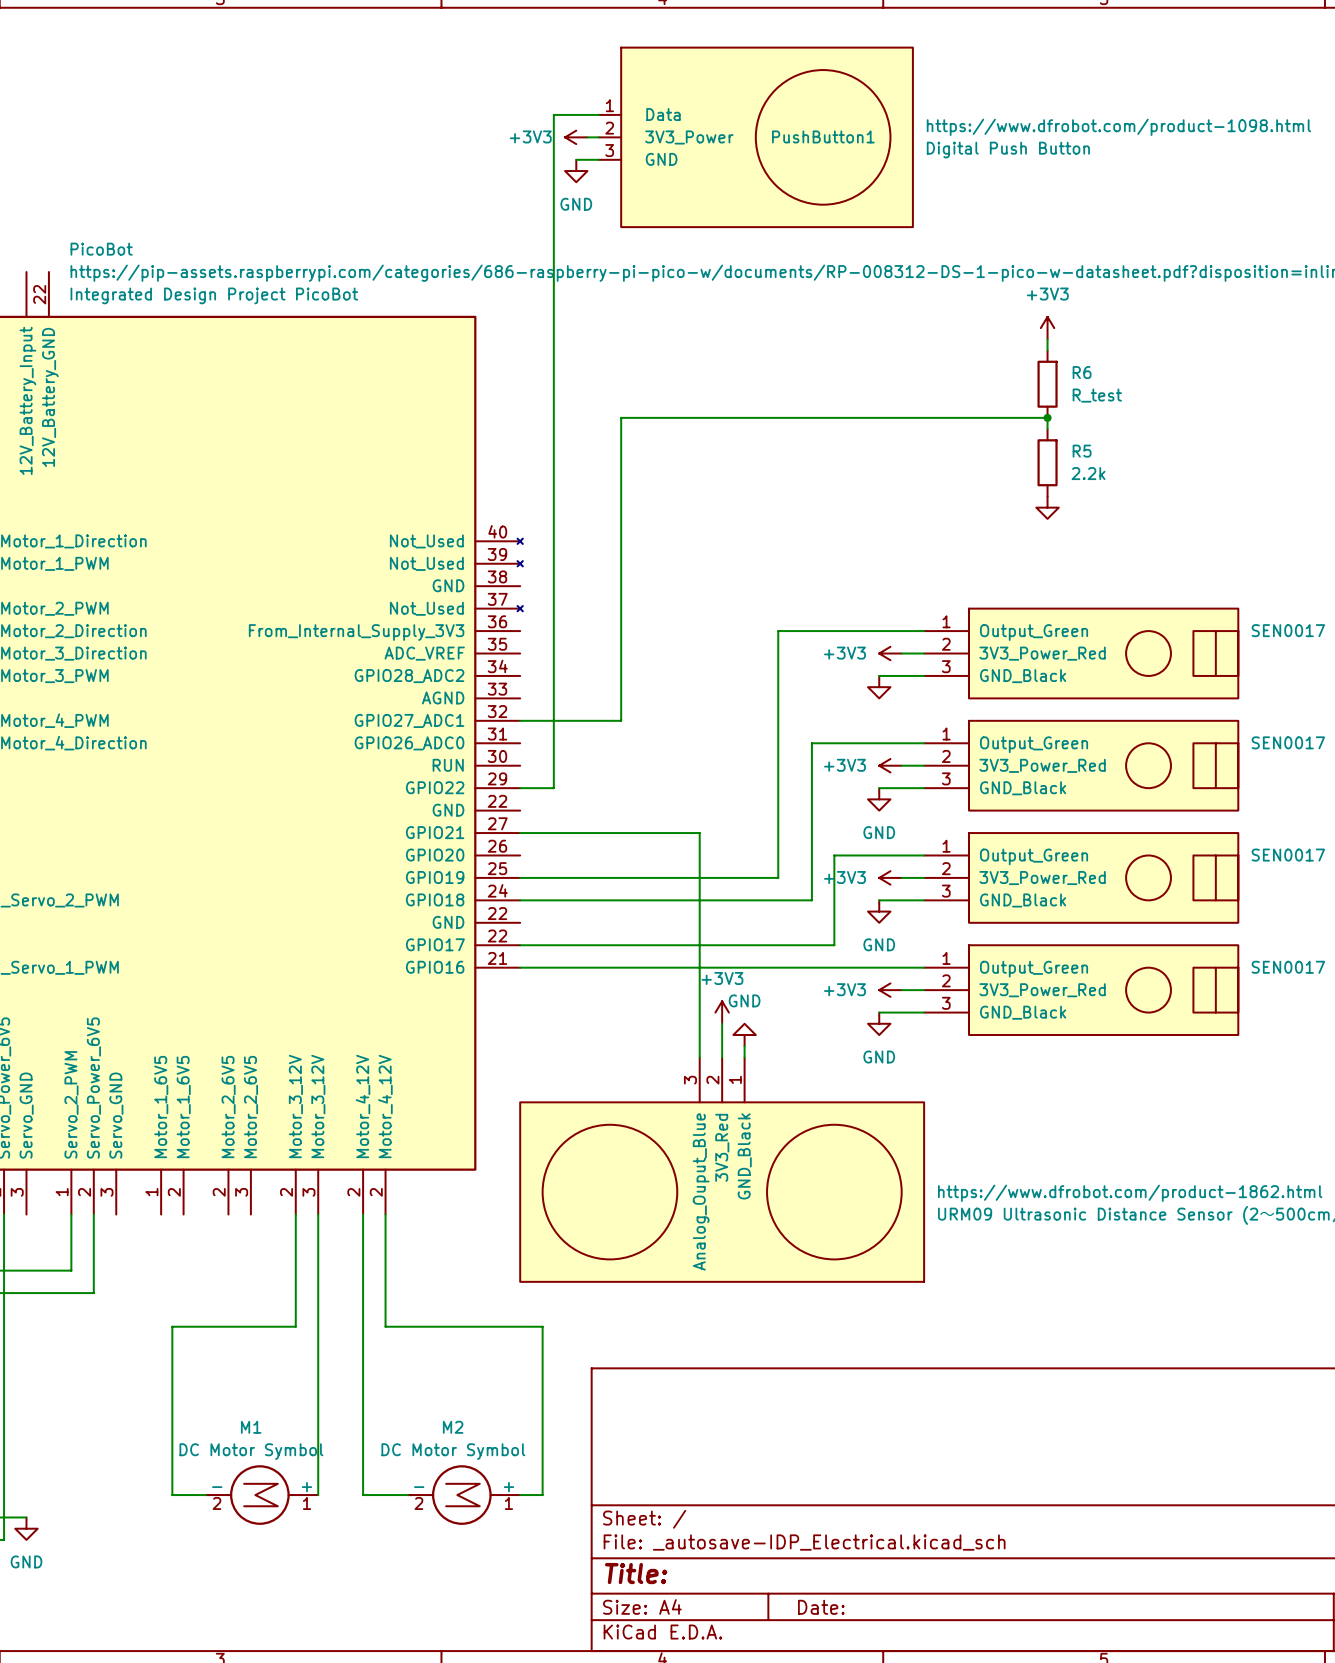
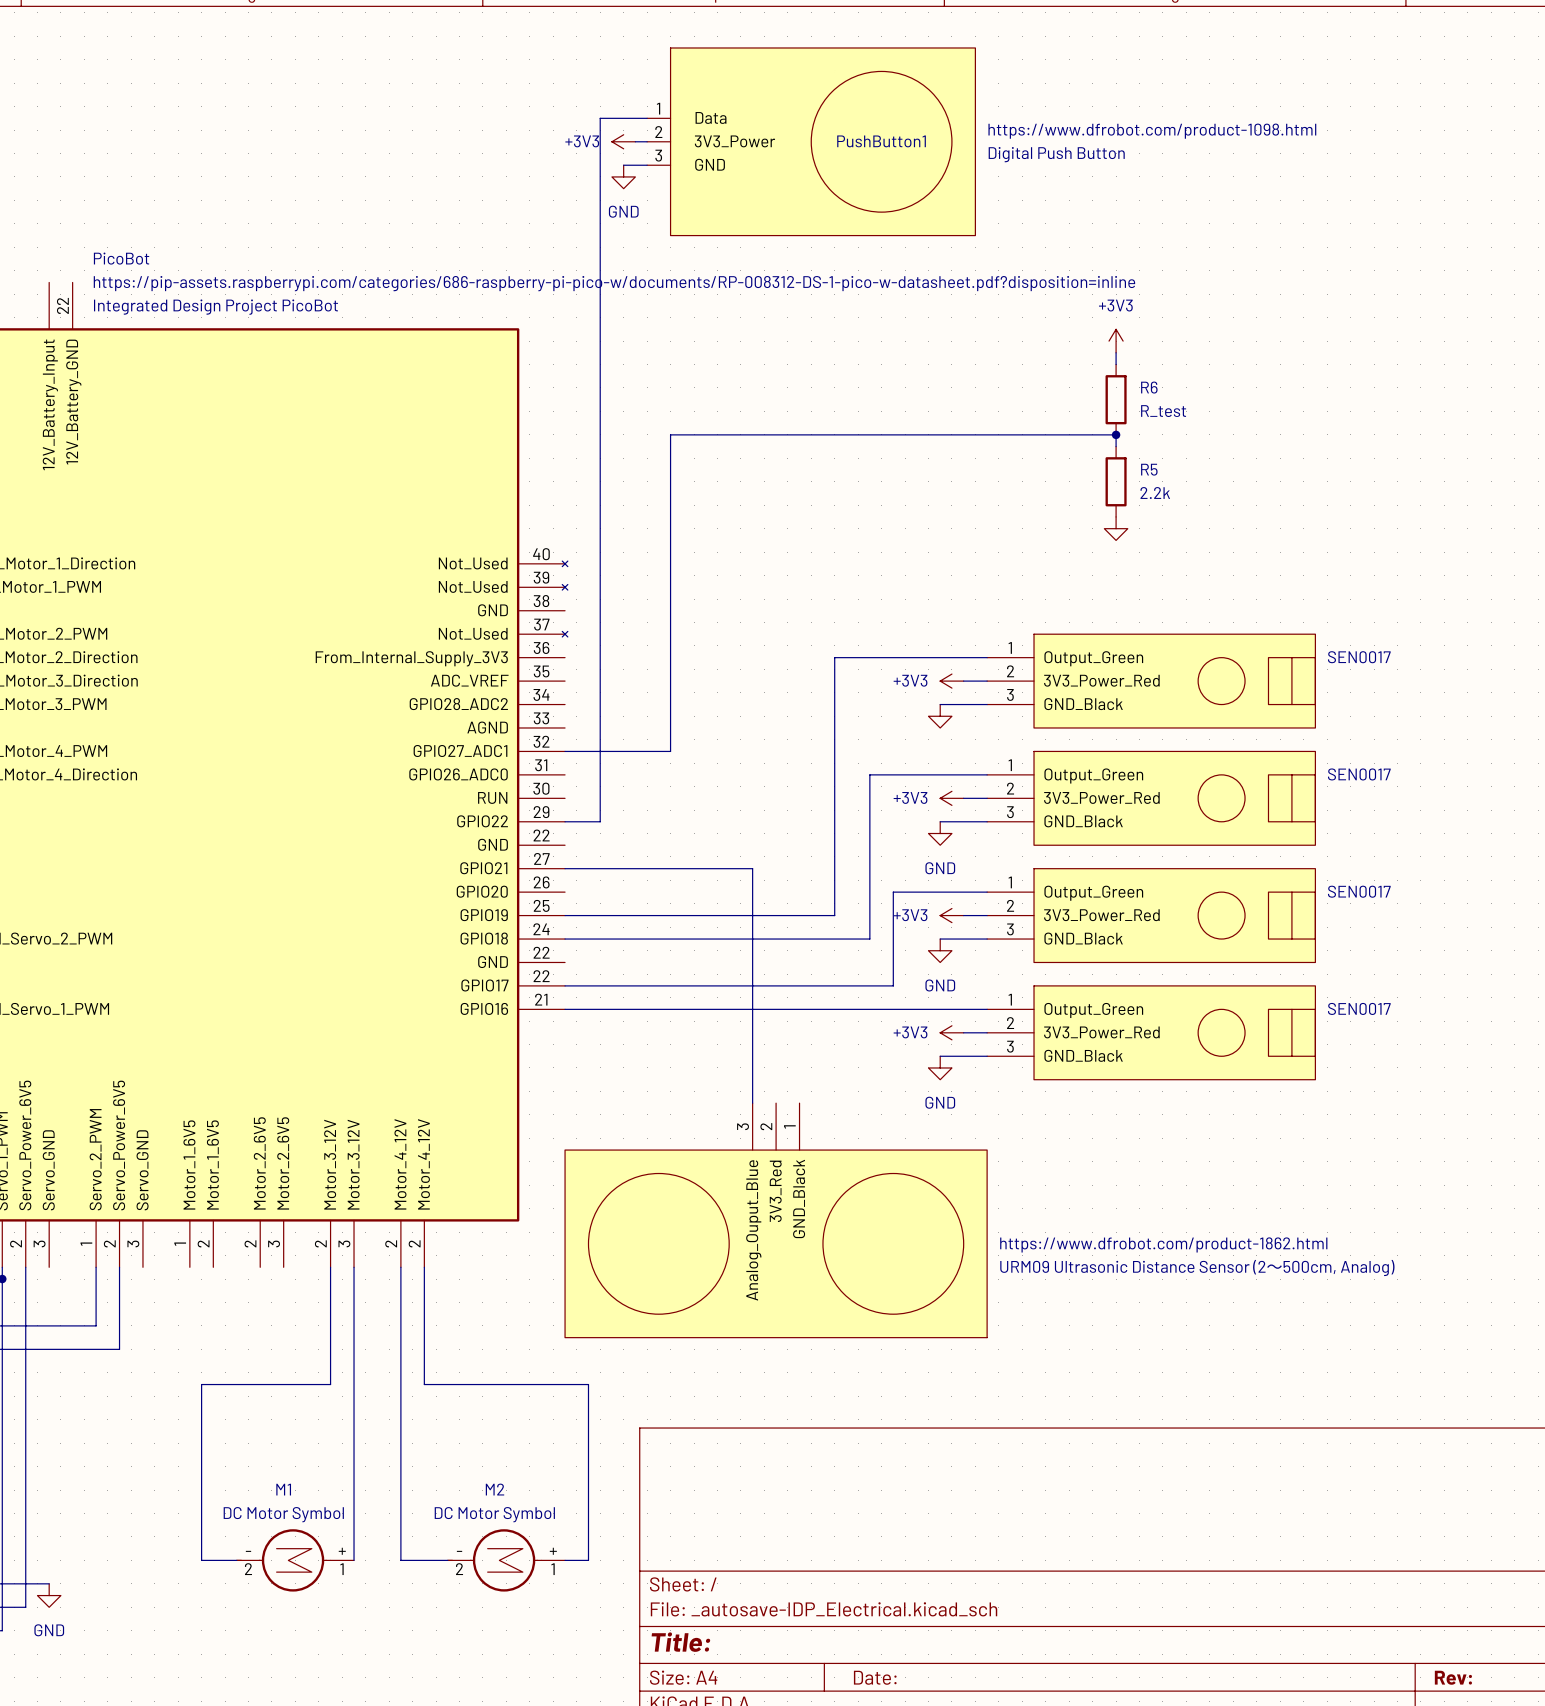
power symbol: +3V3 (722, 1012) -> none
wire: (722, 1023) (722, 1057) -> none
power symbol: GND (744, 1035) -> none
wire: (744, 1046) (744, 1057) -> none

